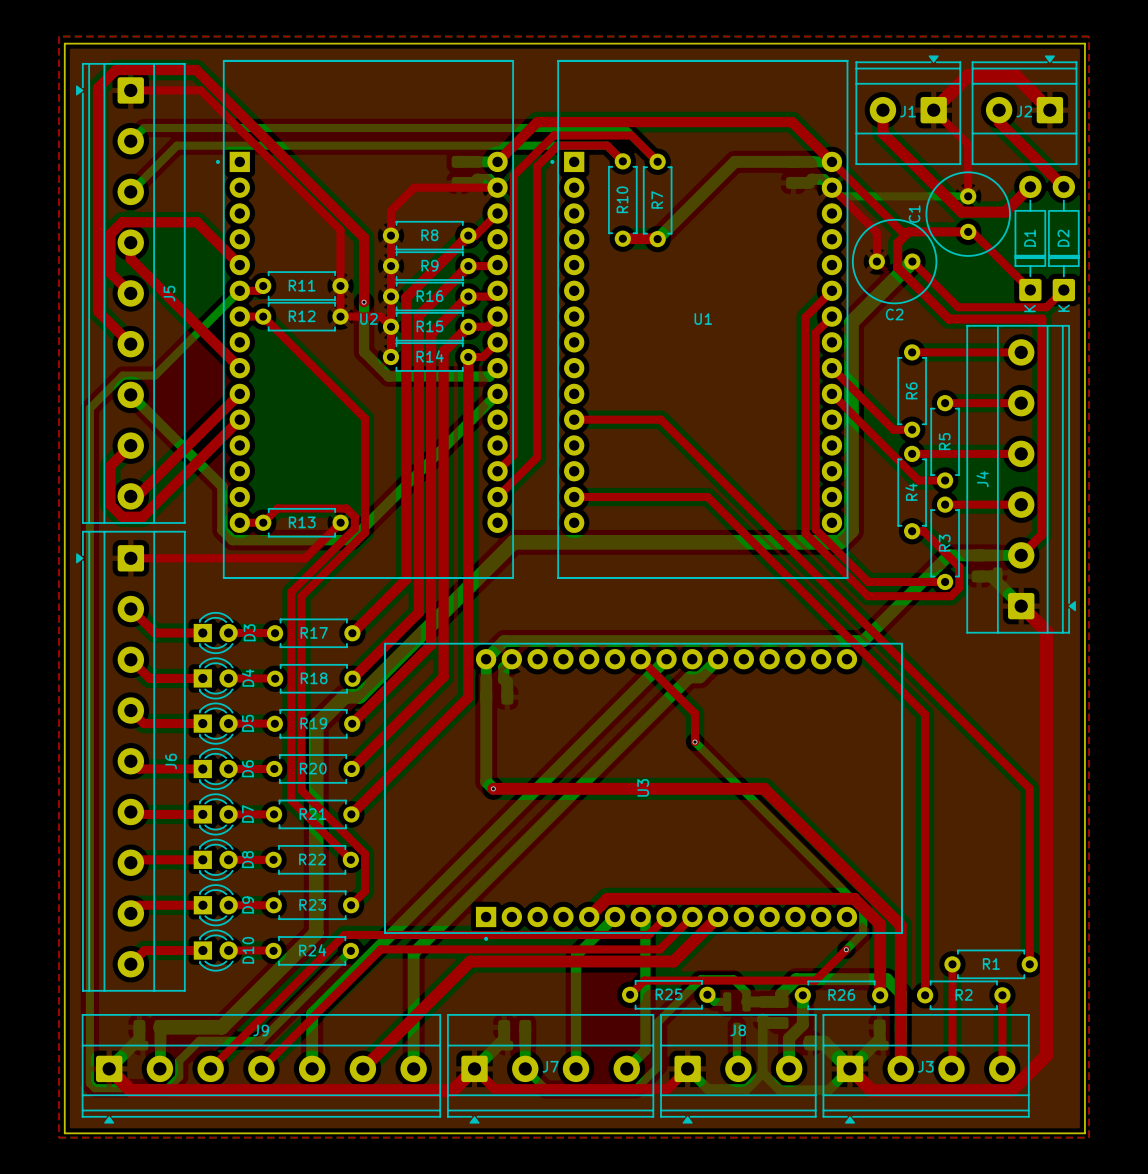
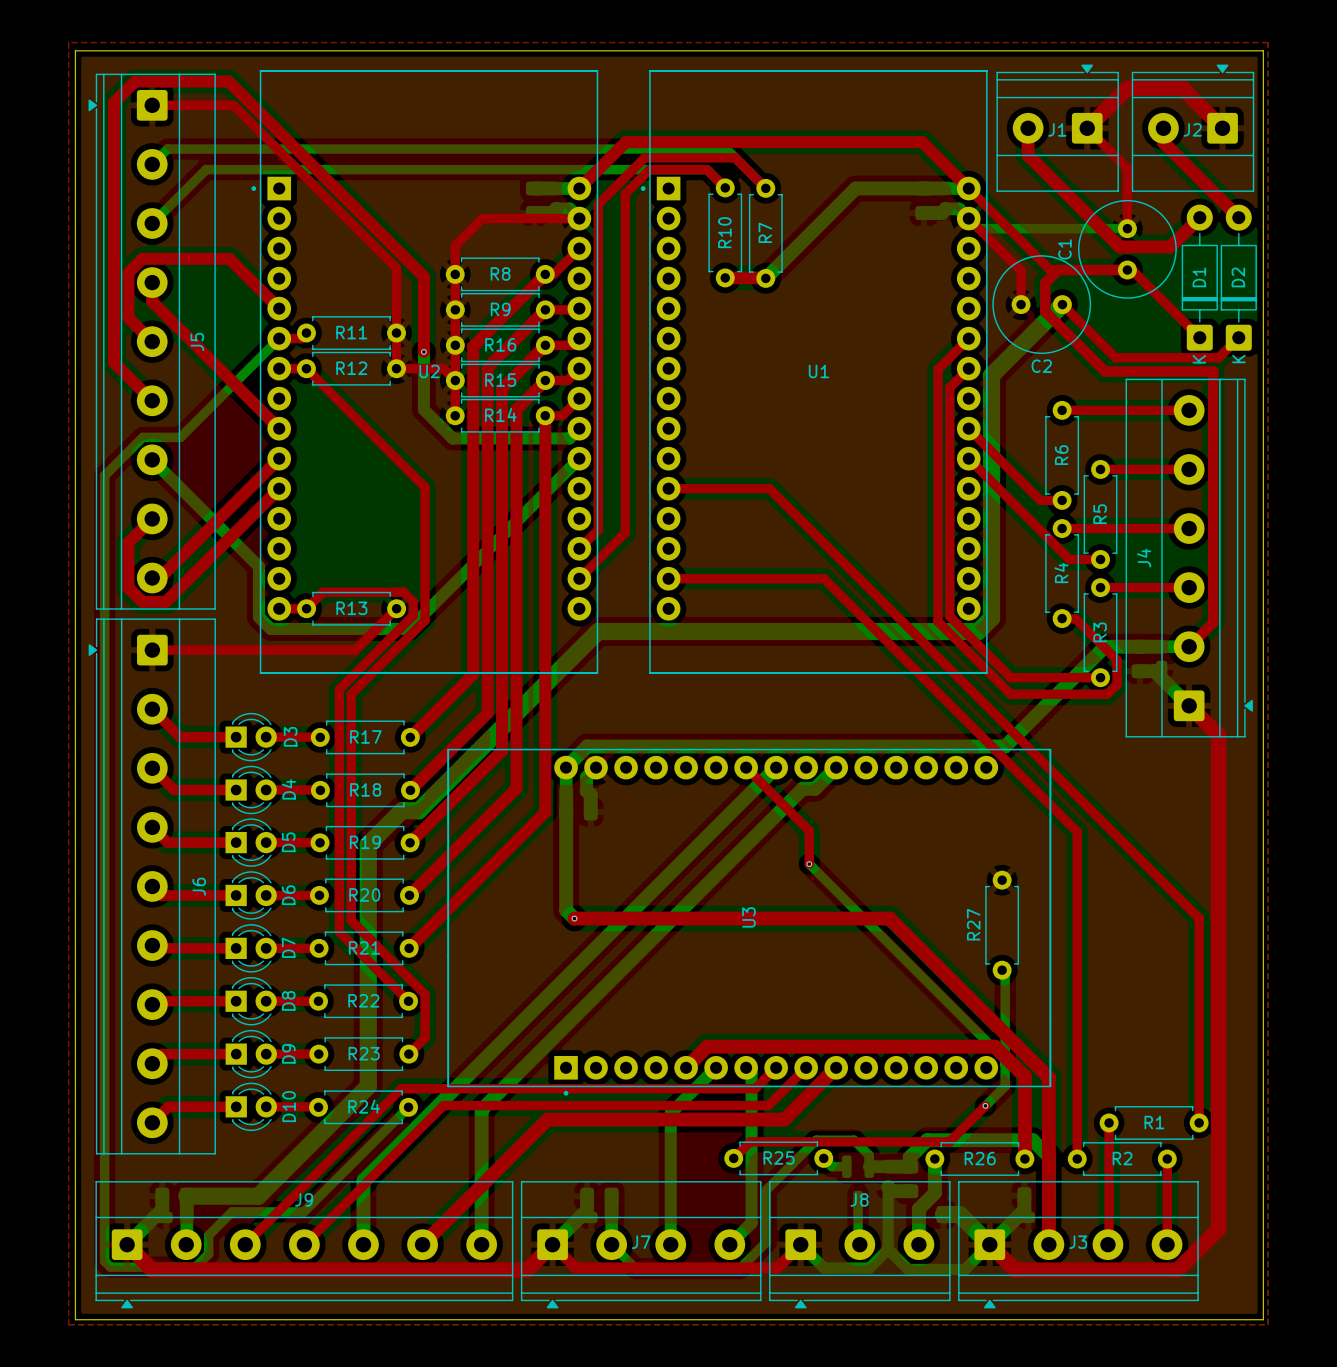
R27: none -> (1002, 925)
bottom track: none -> (1002, 970) (1005, 973) (1005, 1059)

